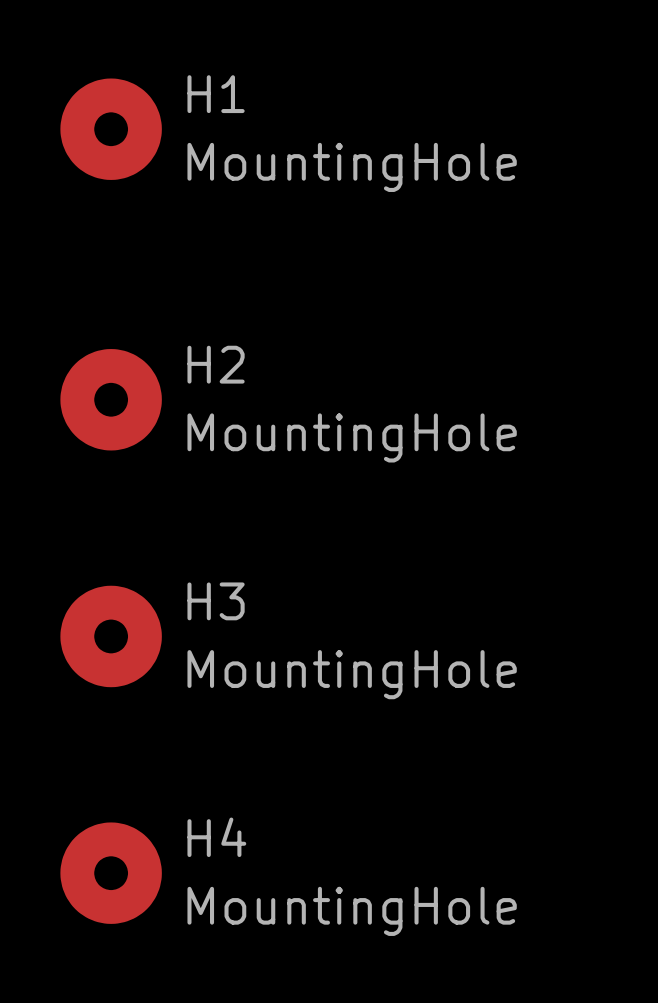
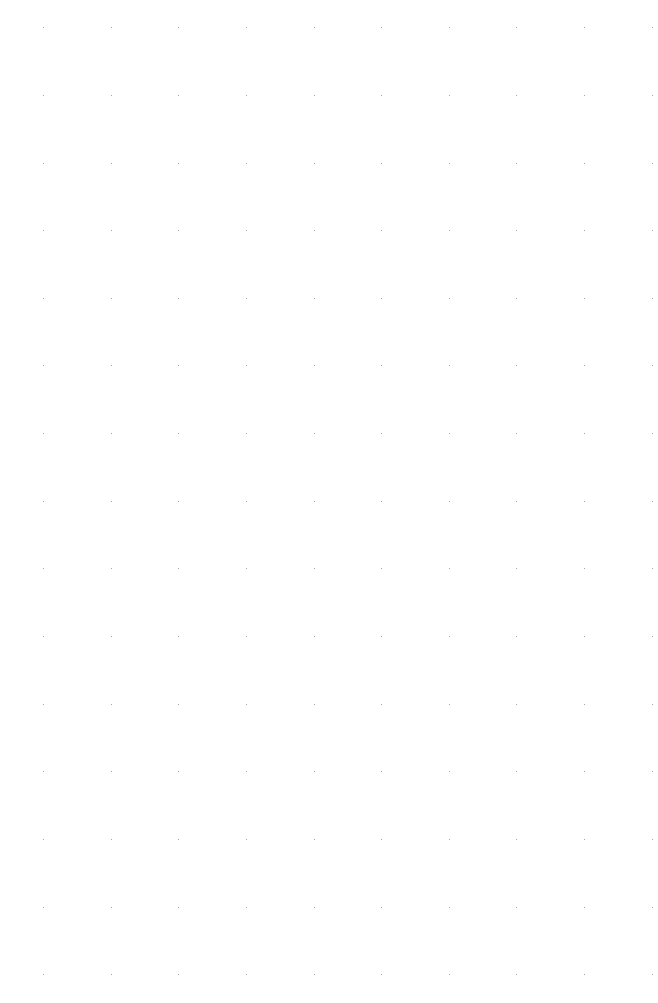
H1: MountingHole (111, 129) -> none
H2: MountingHole (111, 399) -> none
H3: MountingHole (111, 636) -> none
H4: MountingHole (111, 873) -> none

